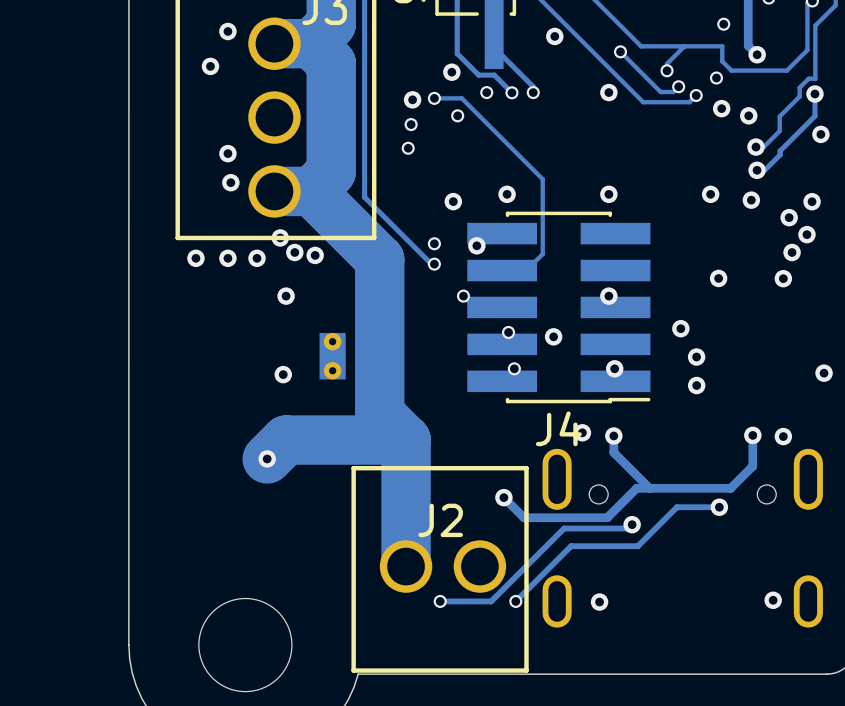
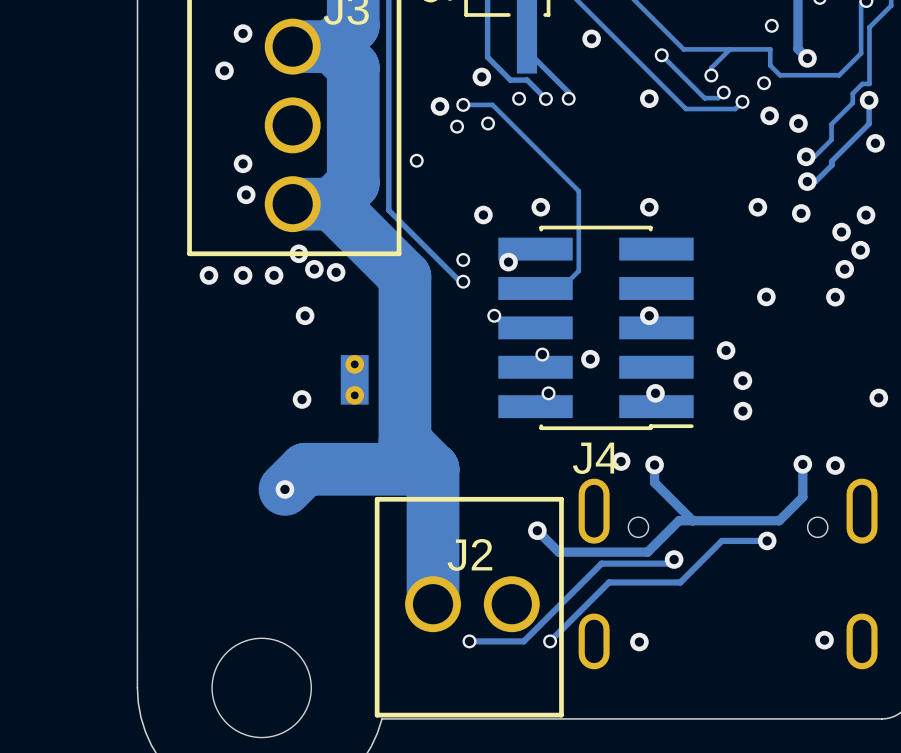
via: none -> (457, 126)
via: (411, 124) -> none
via: (408, 148) -> none
via: none -> (416, 160)

